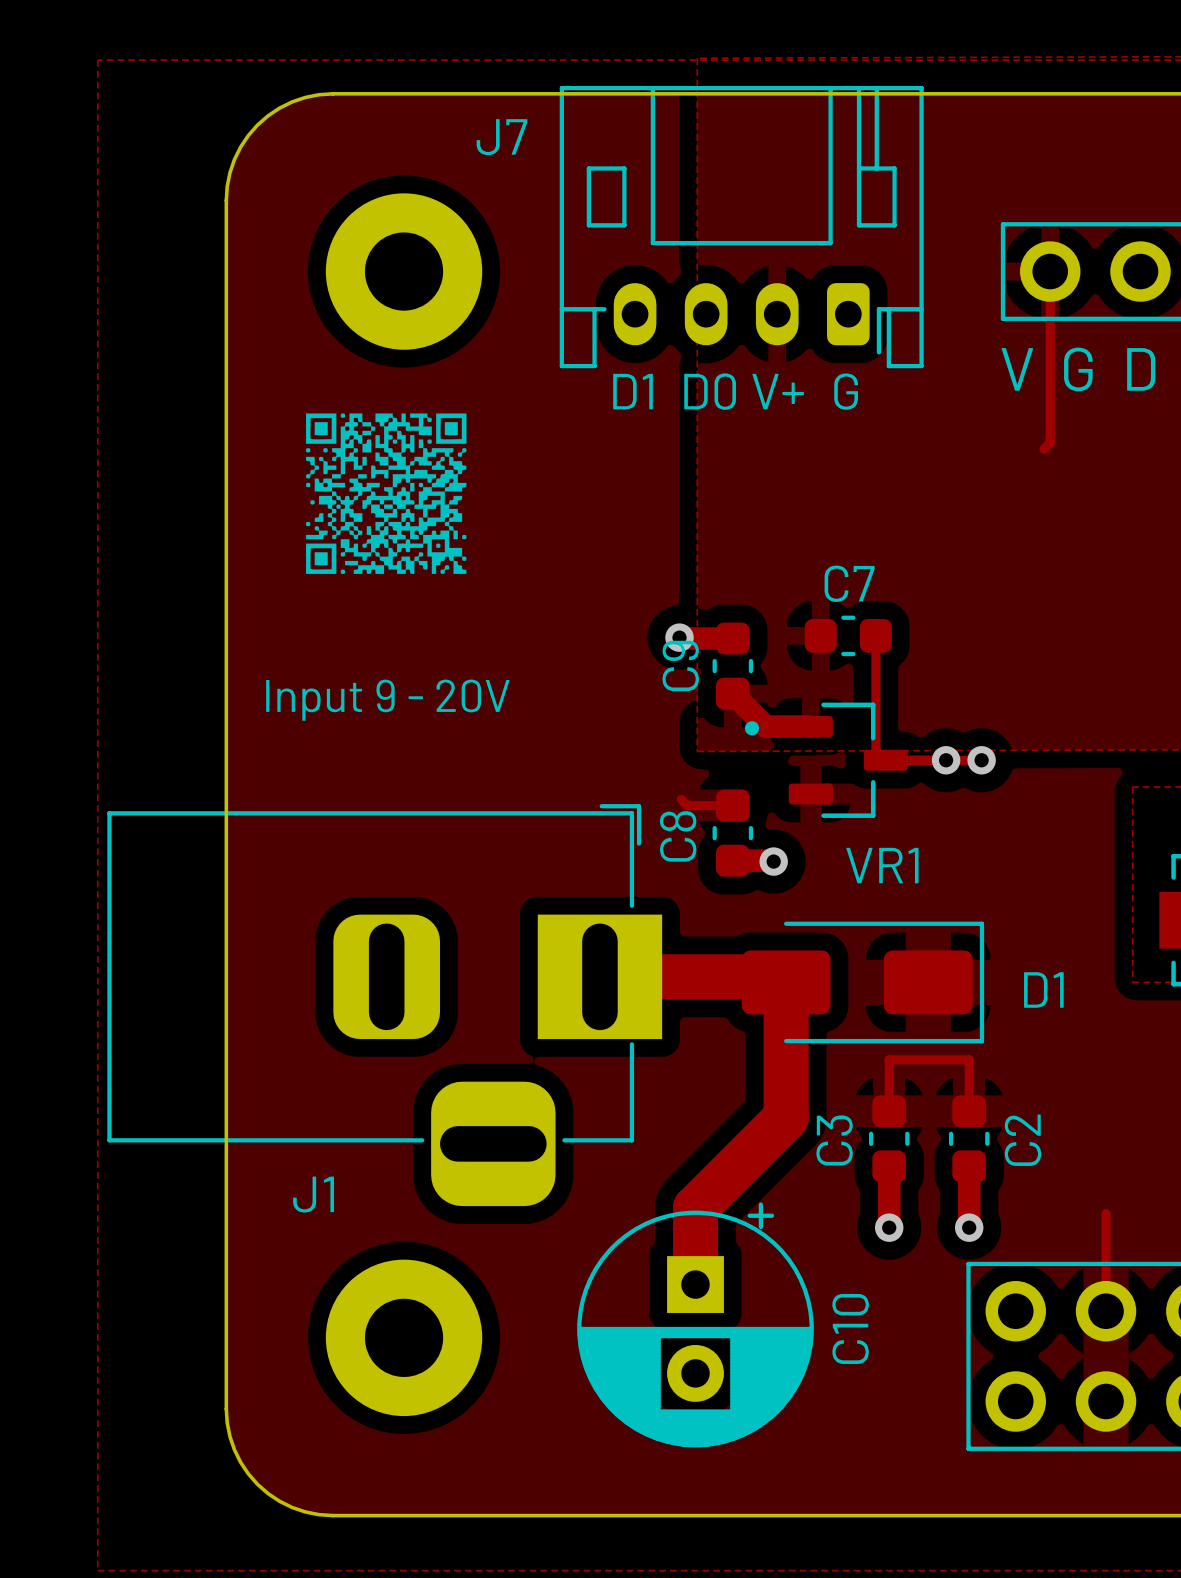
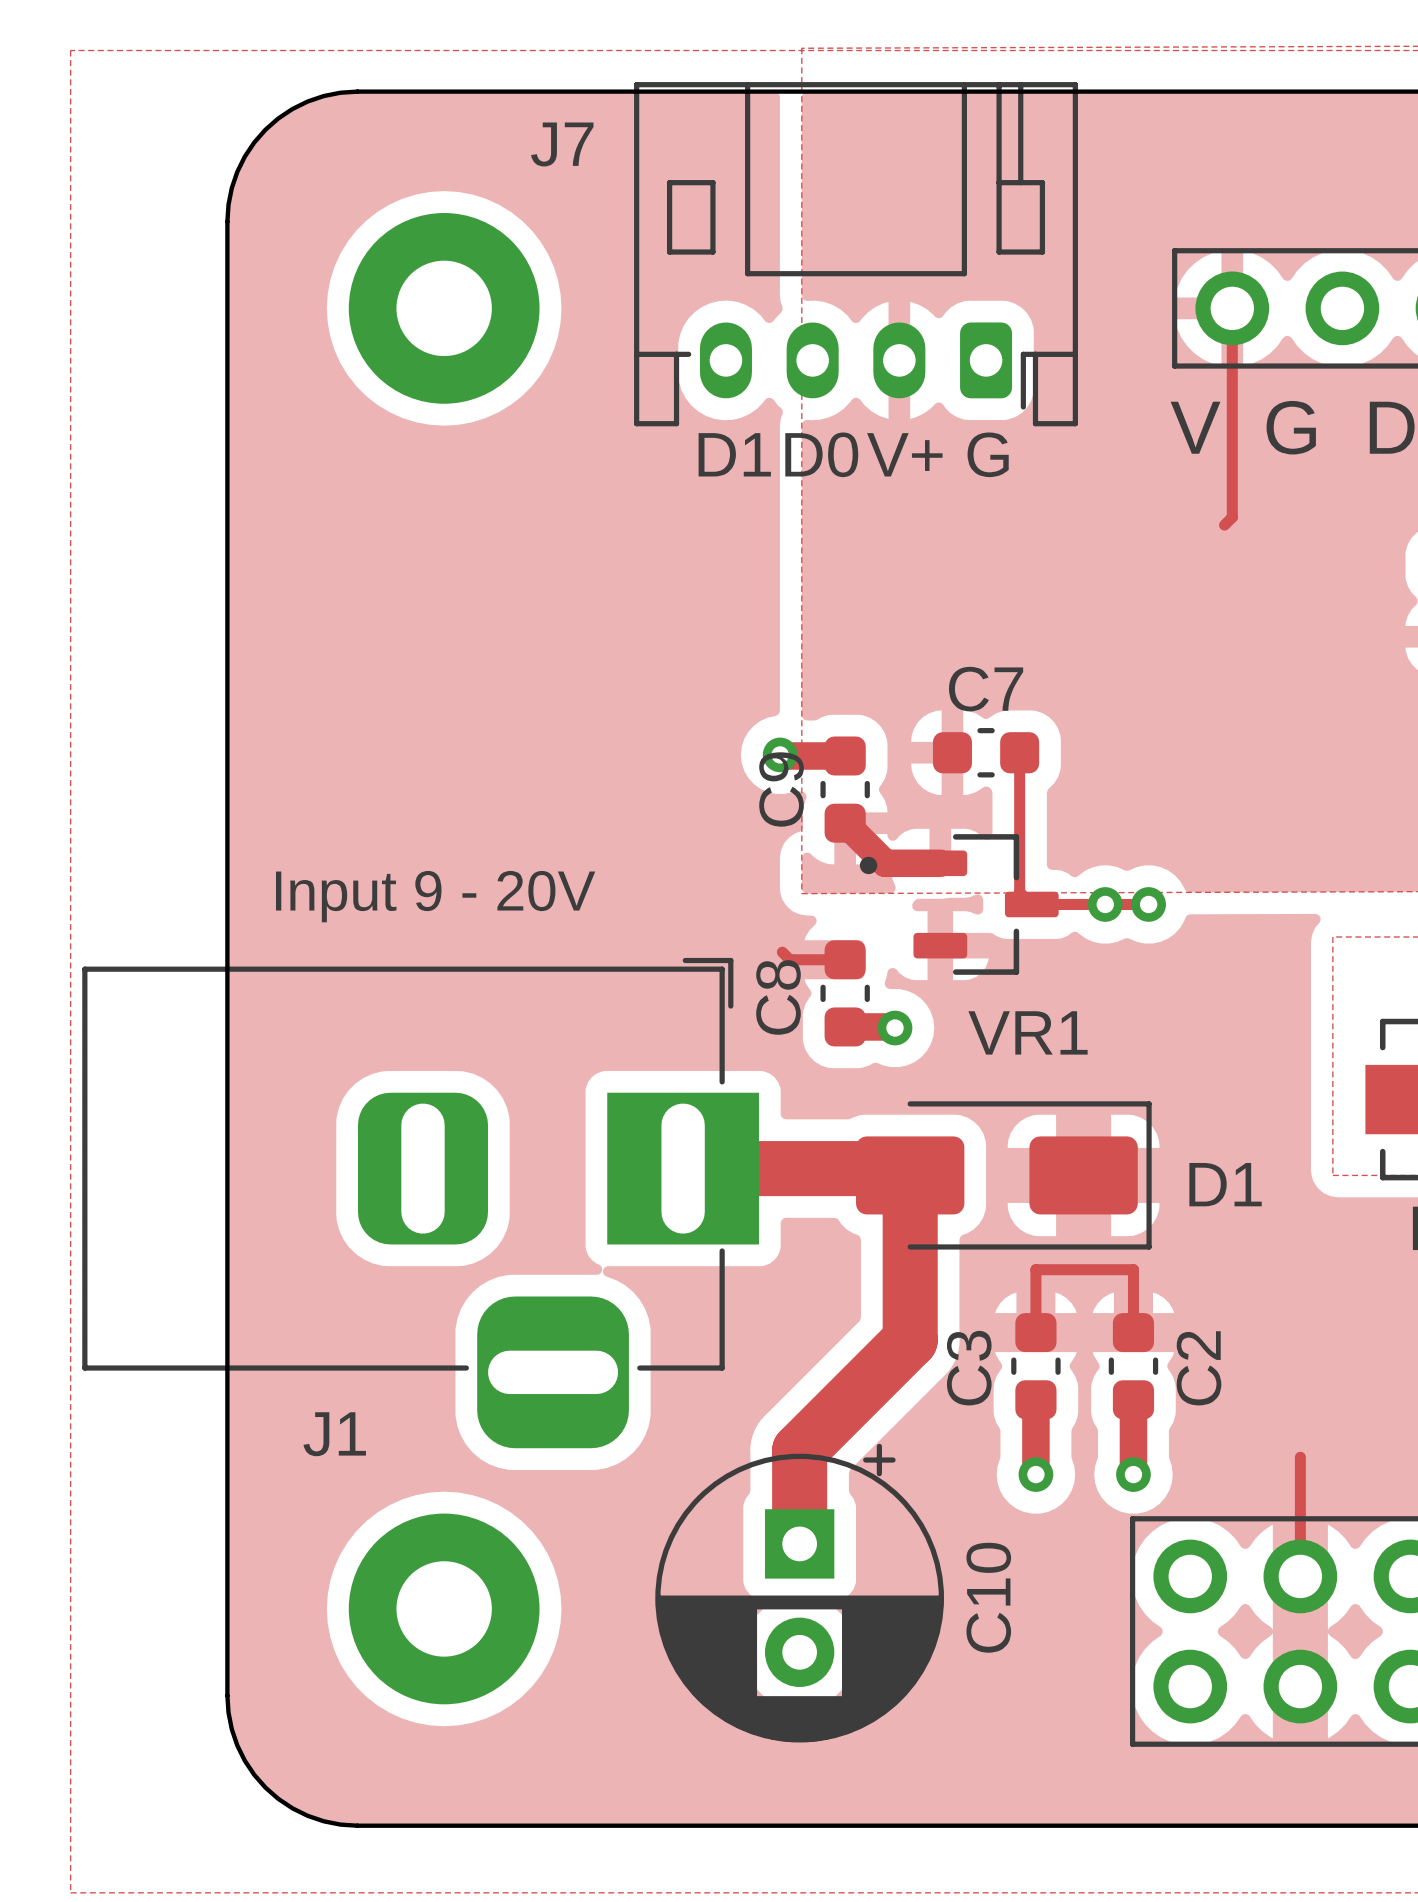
drawing: [306, 413, 467, 574] -> none
text position: Input 9 - 20V (387, 700) -> Input 9 - 20V (435, 896)

